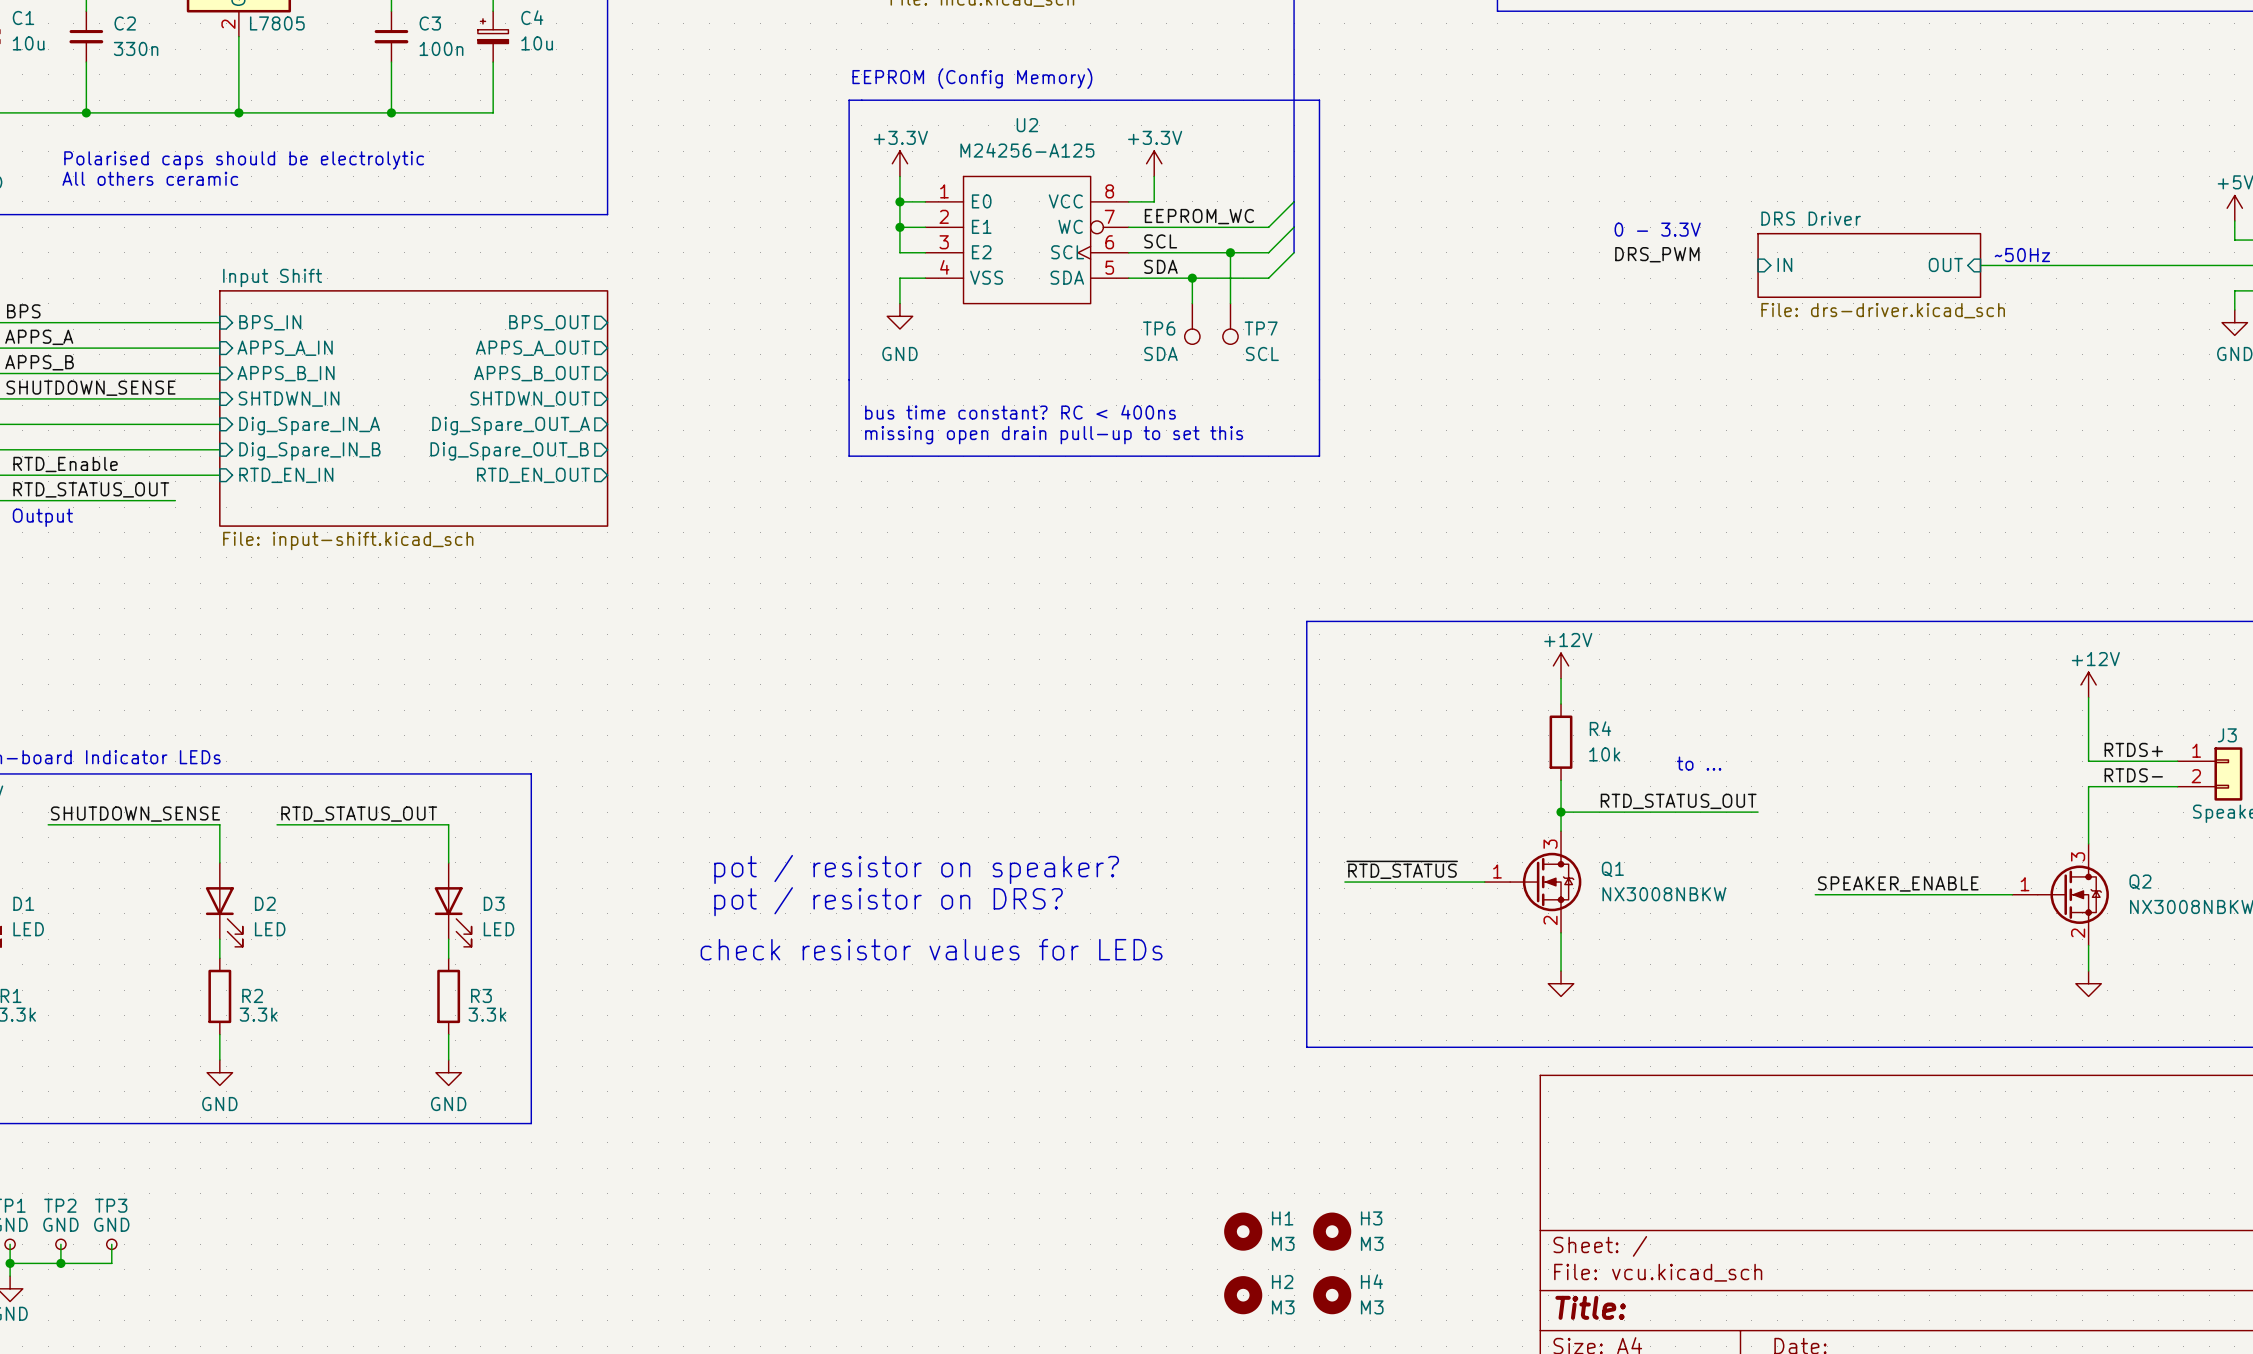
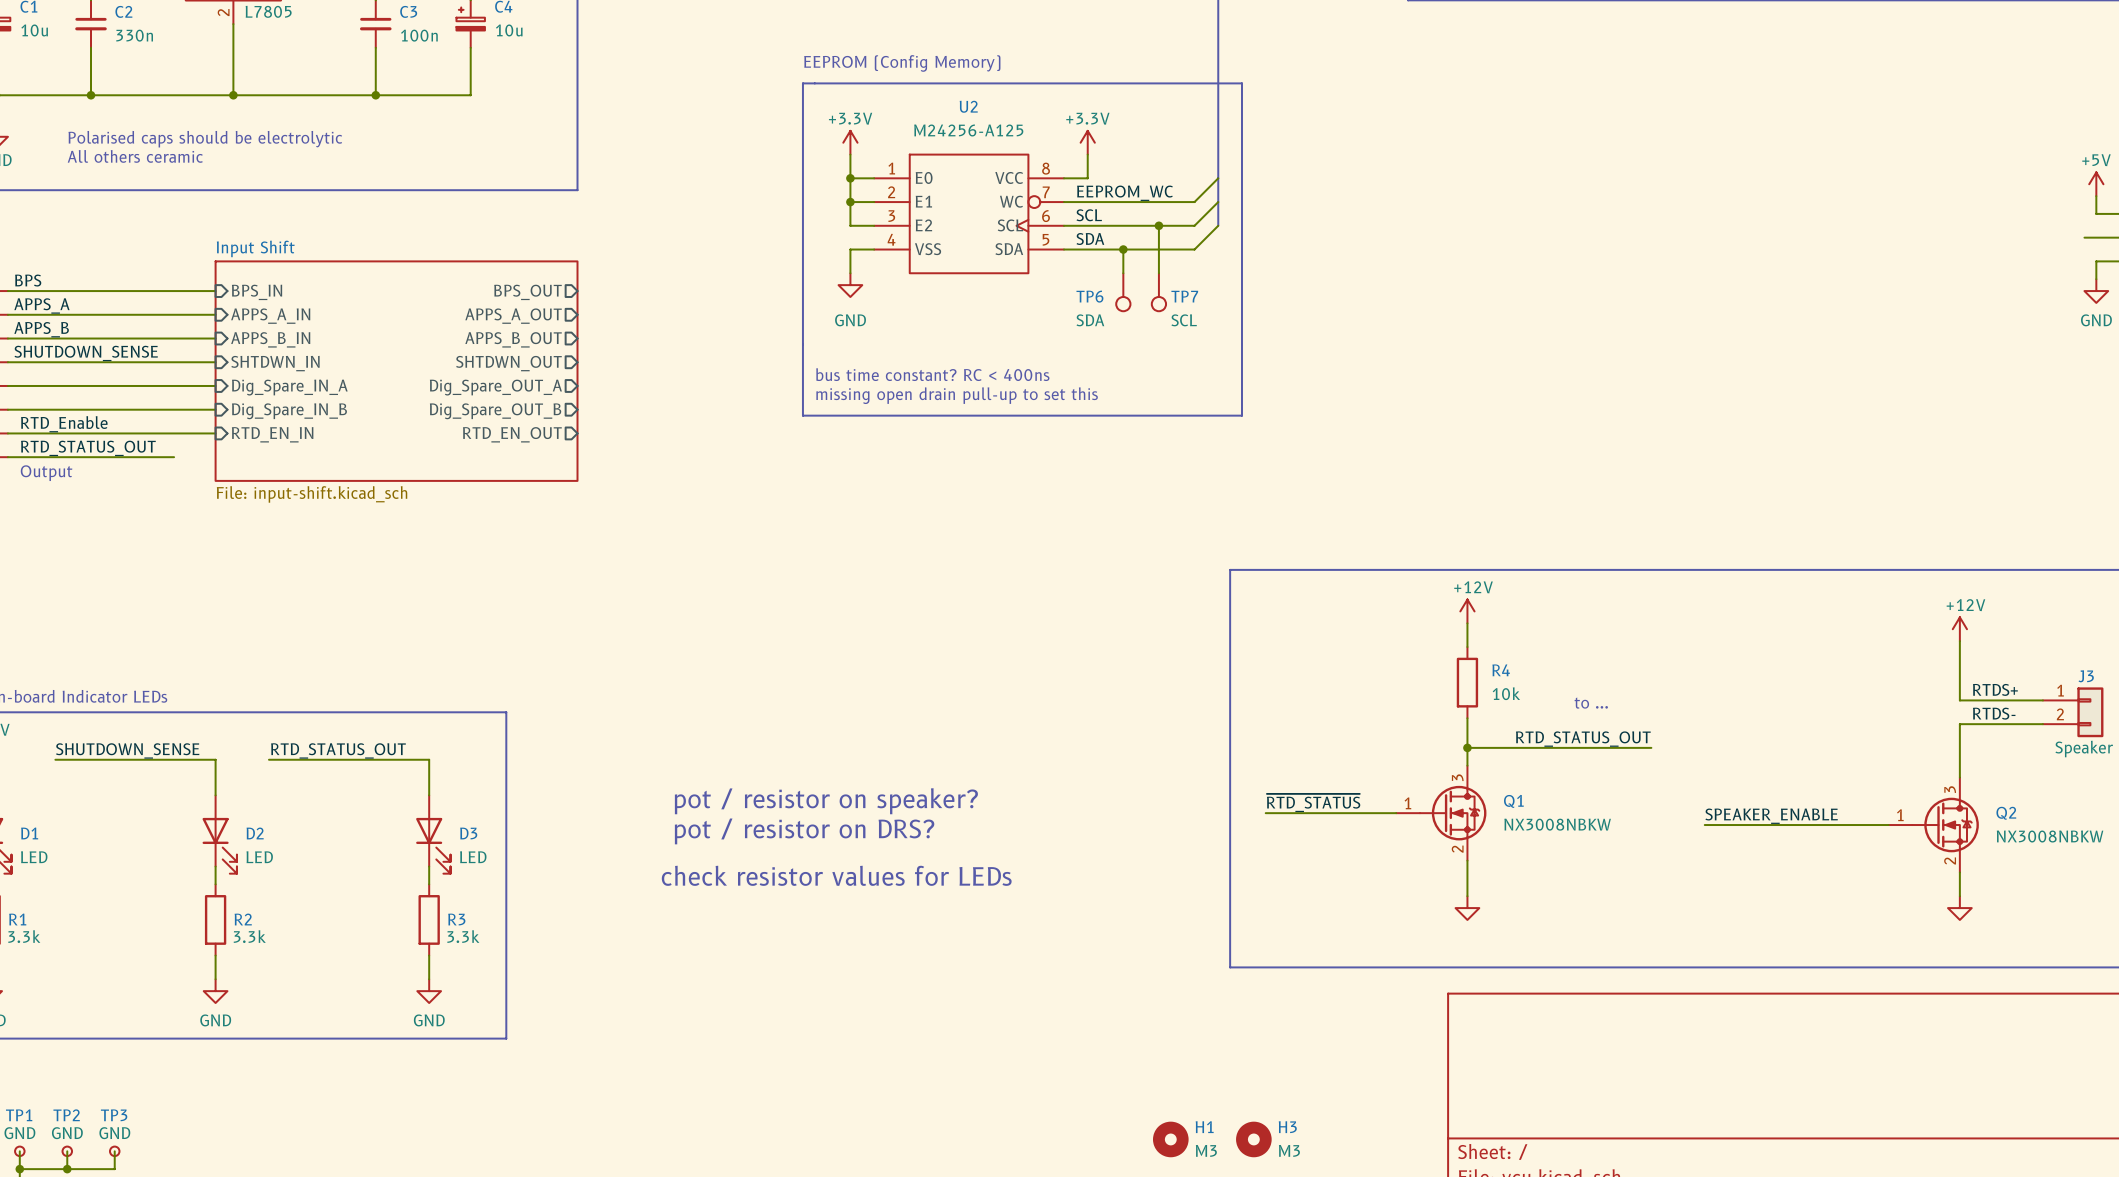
text: 0 - 3.3V (1657, 229) -> none
label: DRS_PWM (1657, 254) -> none
text: ~50Hz (2022, 255) -> none
sheet pin: IN (1784, 264) -> none
sheet pin: OUT (1945, 264) -> none
sheet DRS Driver: File: drs-driver.kicad_sch (1869, 265) -> none
wire: (1980, 265) (2222, 265) -> none

